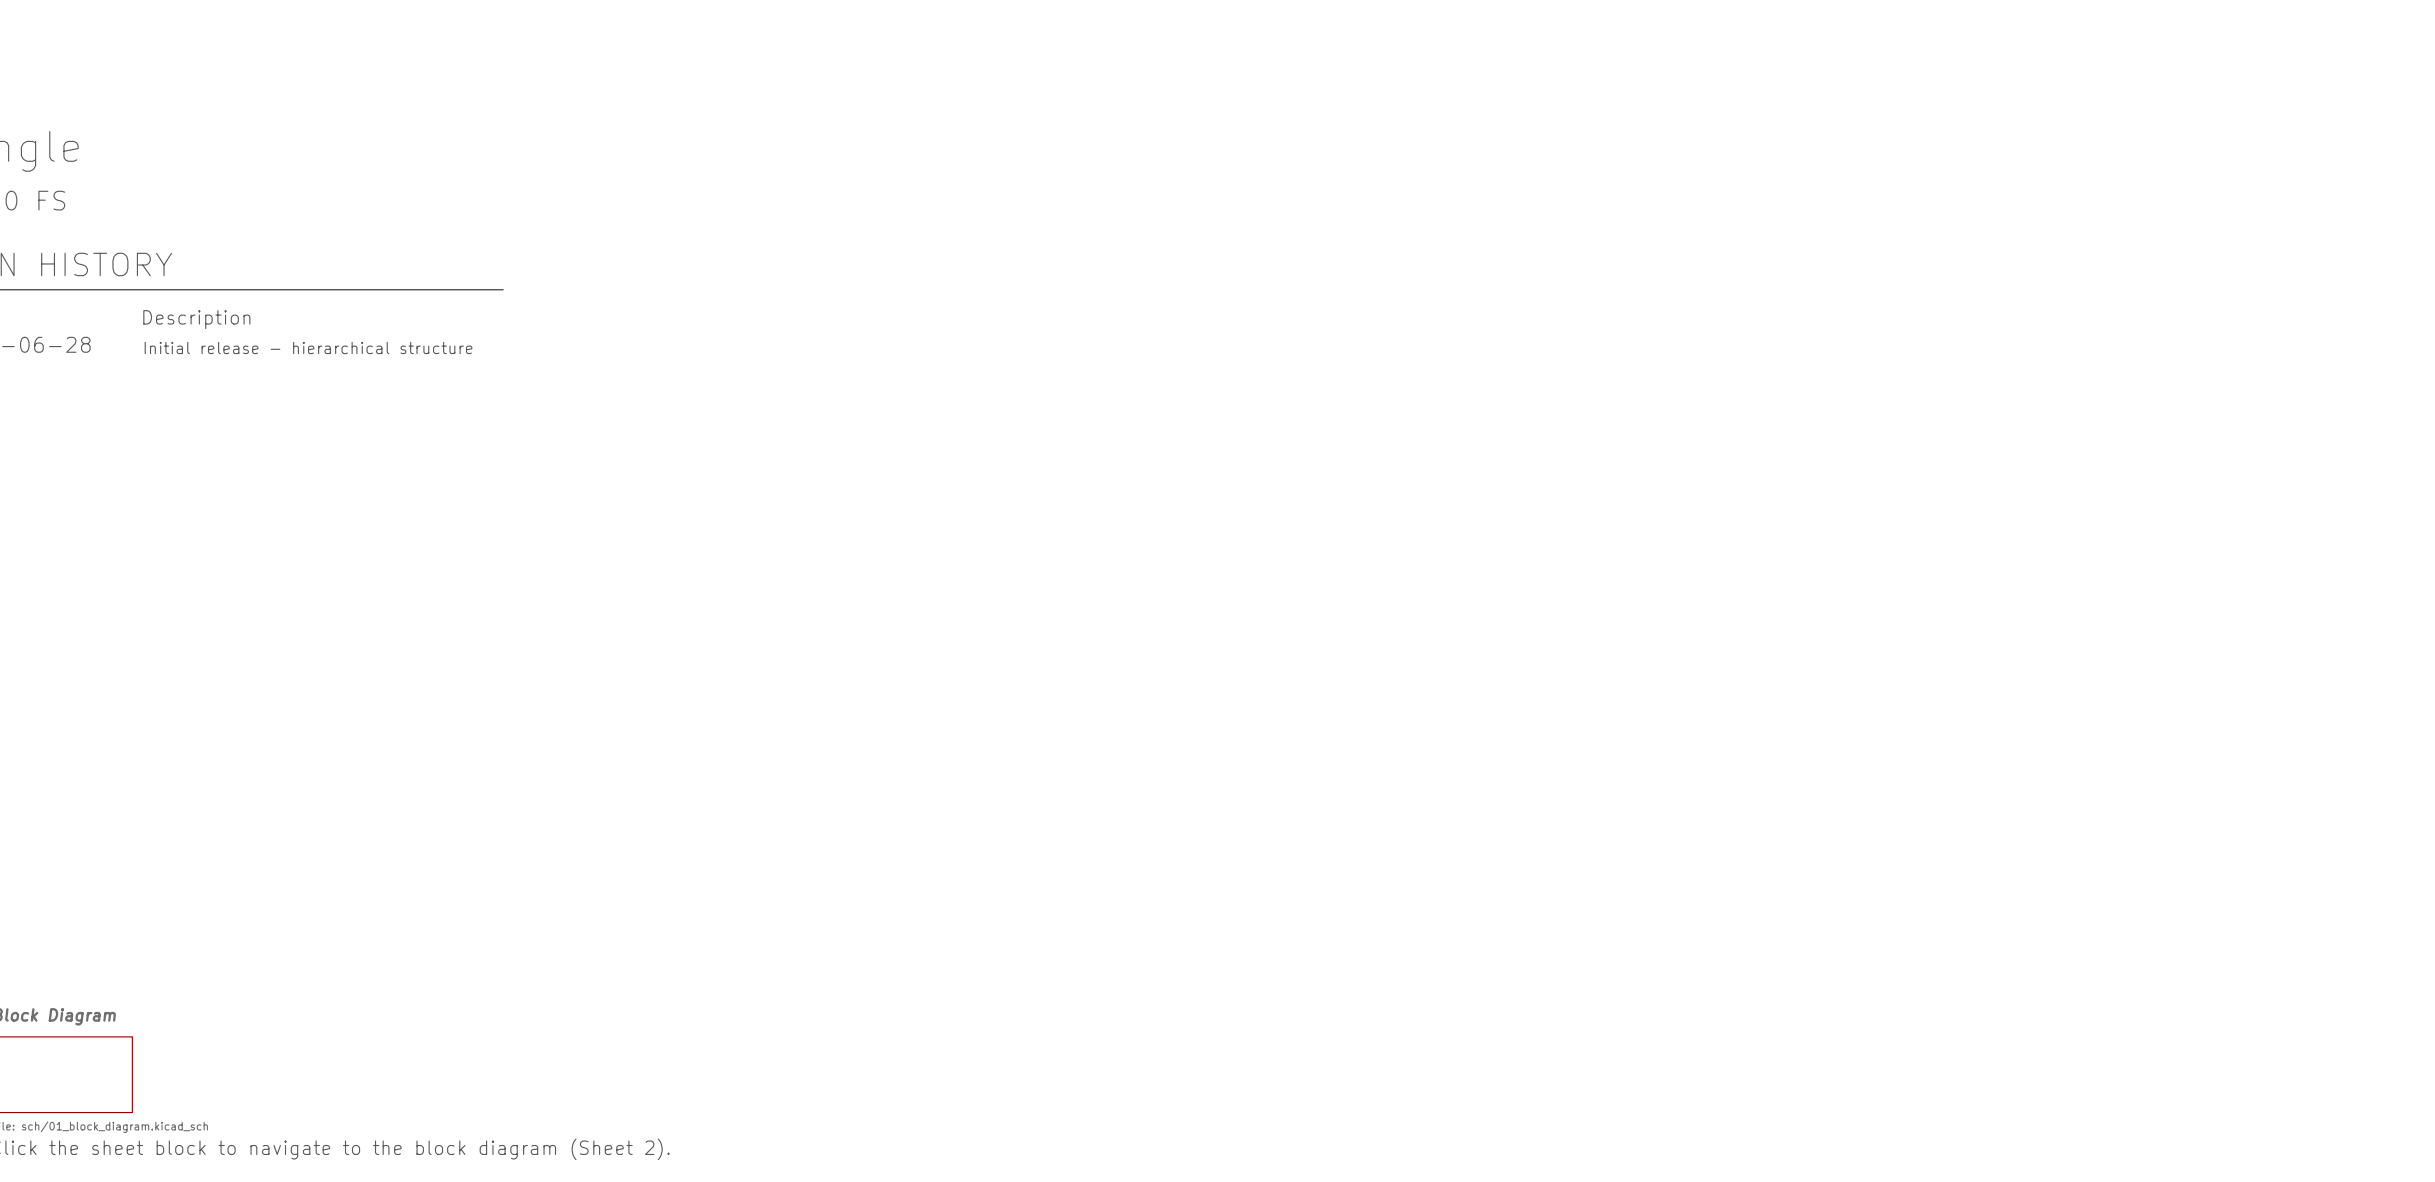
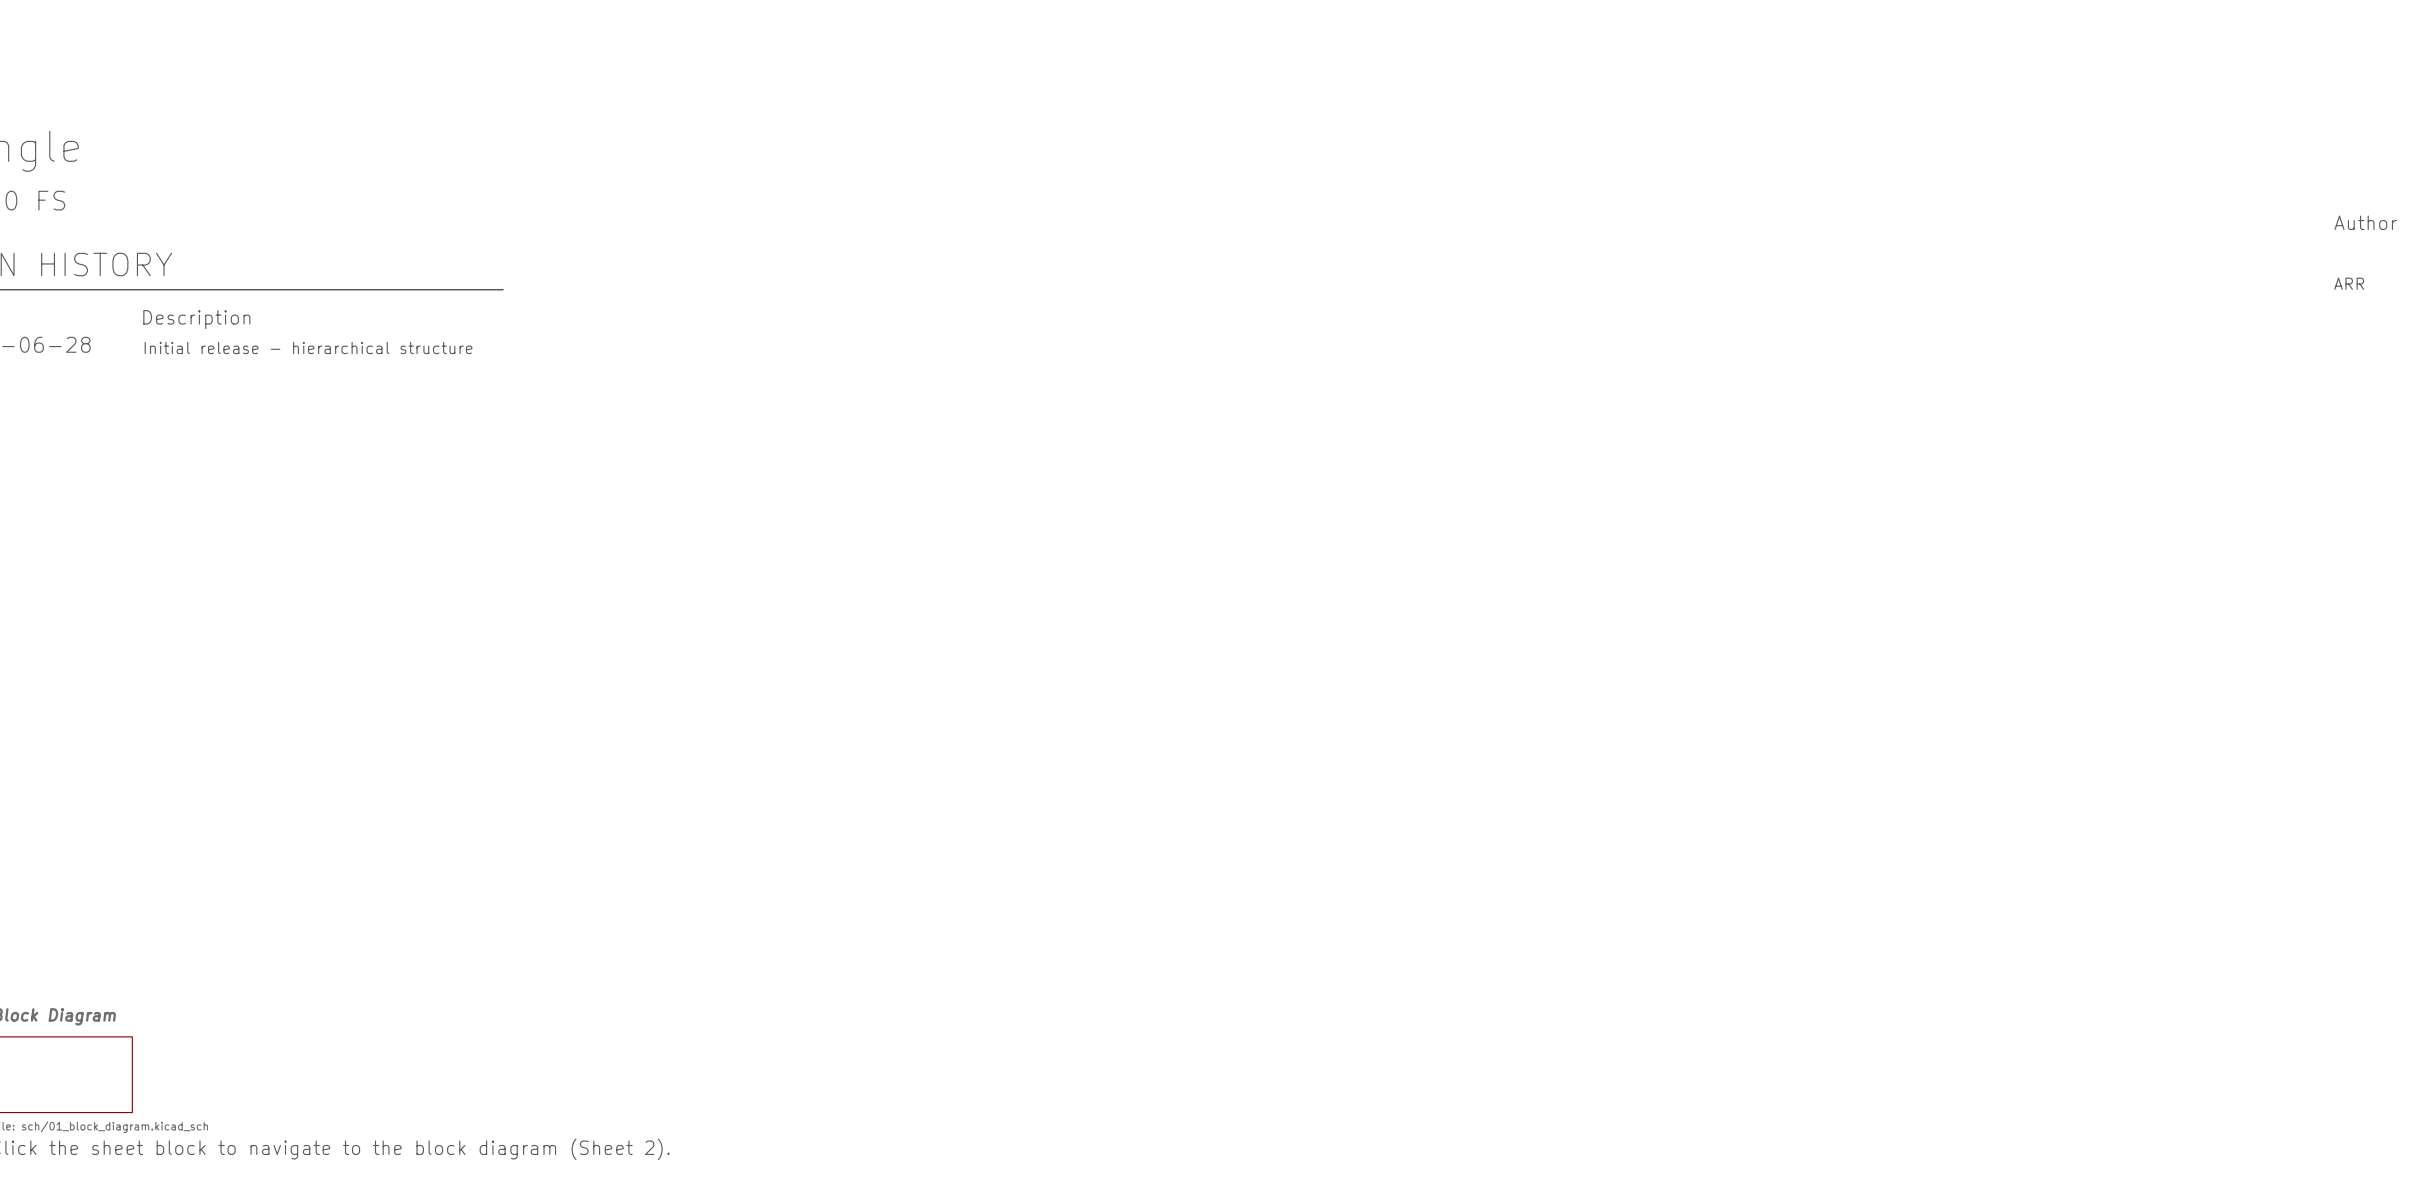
text: none -> Author (2365, 222)
text: none -> ARR (2349, 283)

